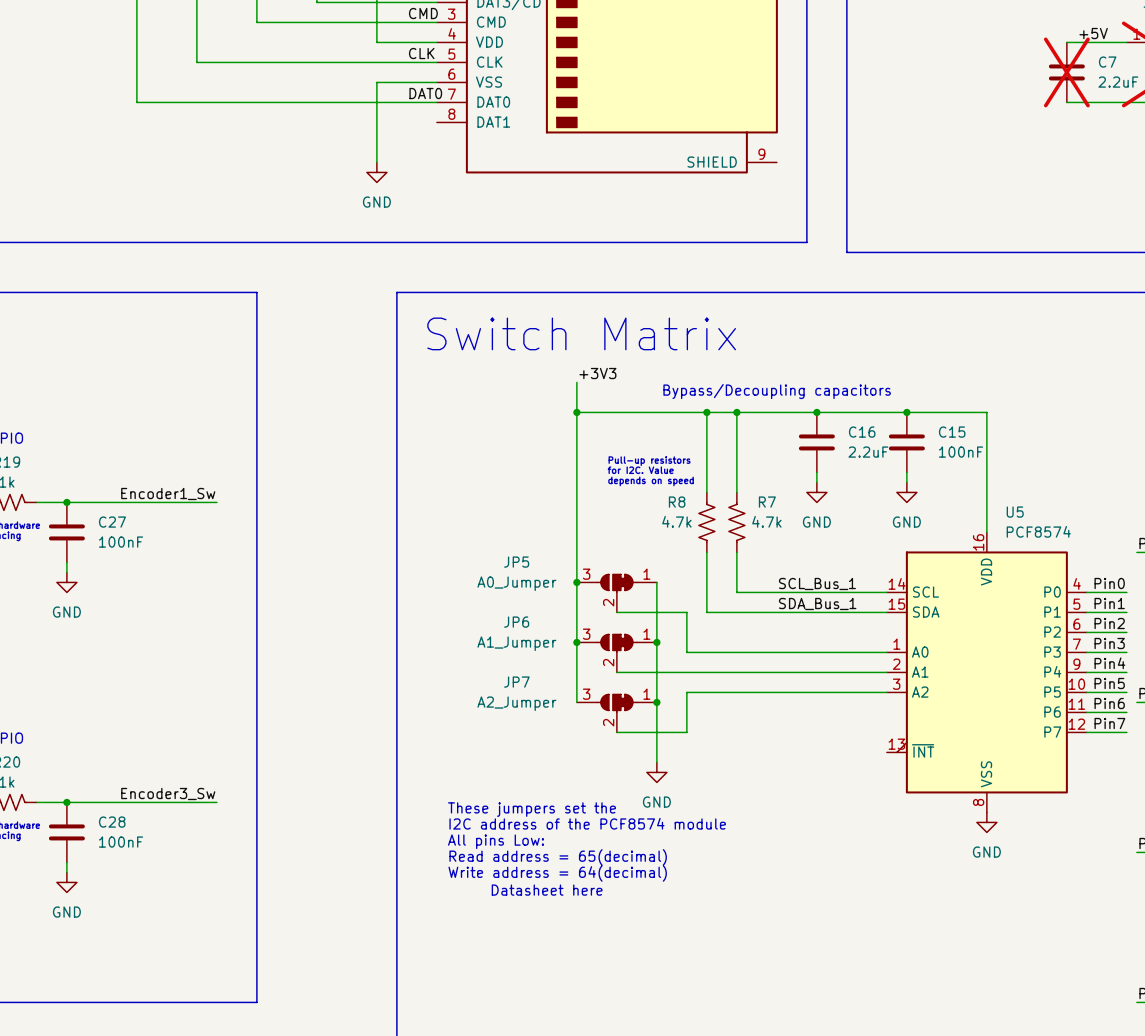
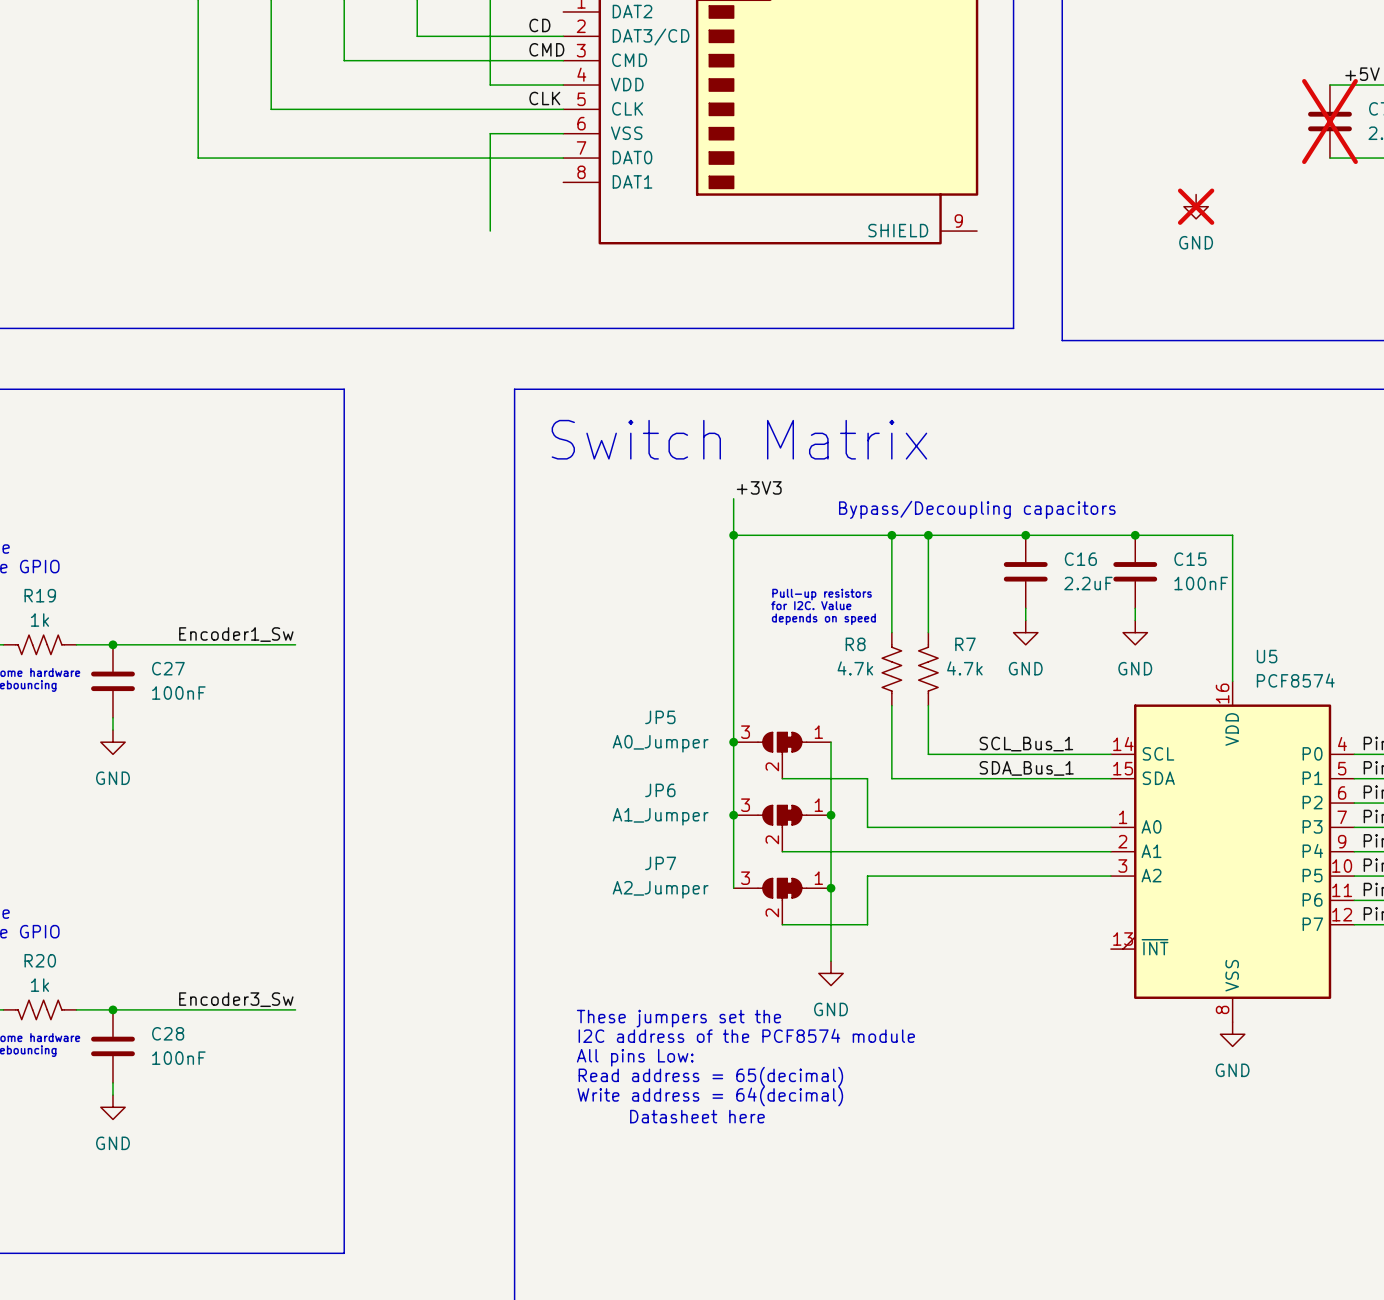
label: DAT0 (425, 93) -> none
power symbol: none -> GND (1196, 206)
power symbol: GND (376, 172) -> none

